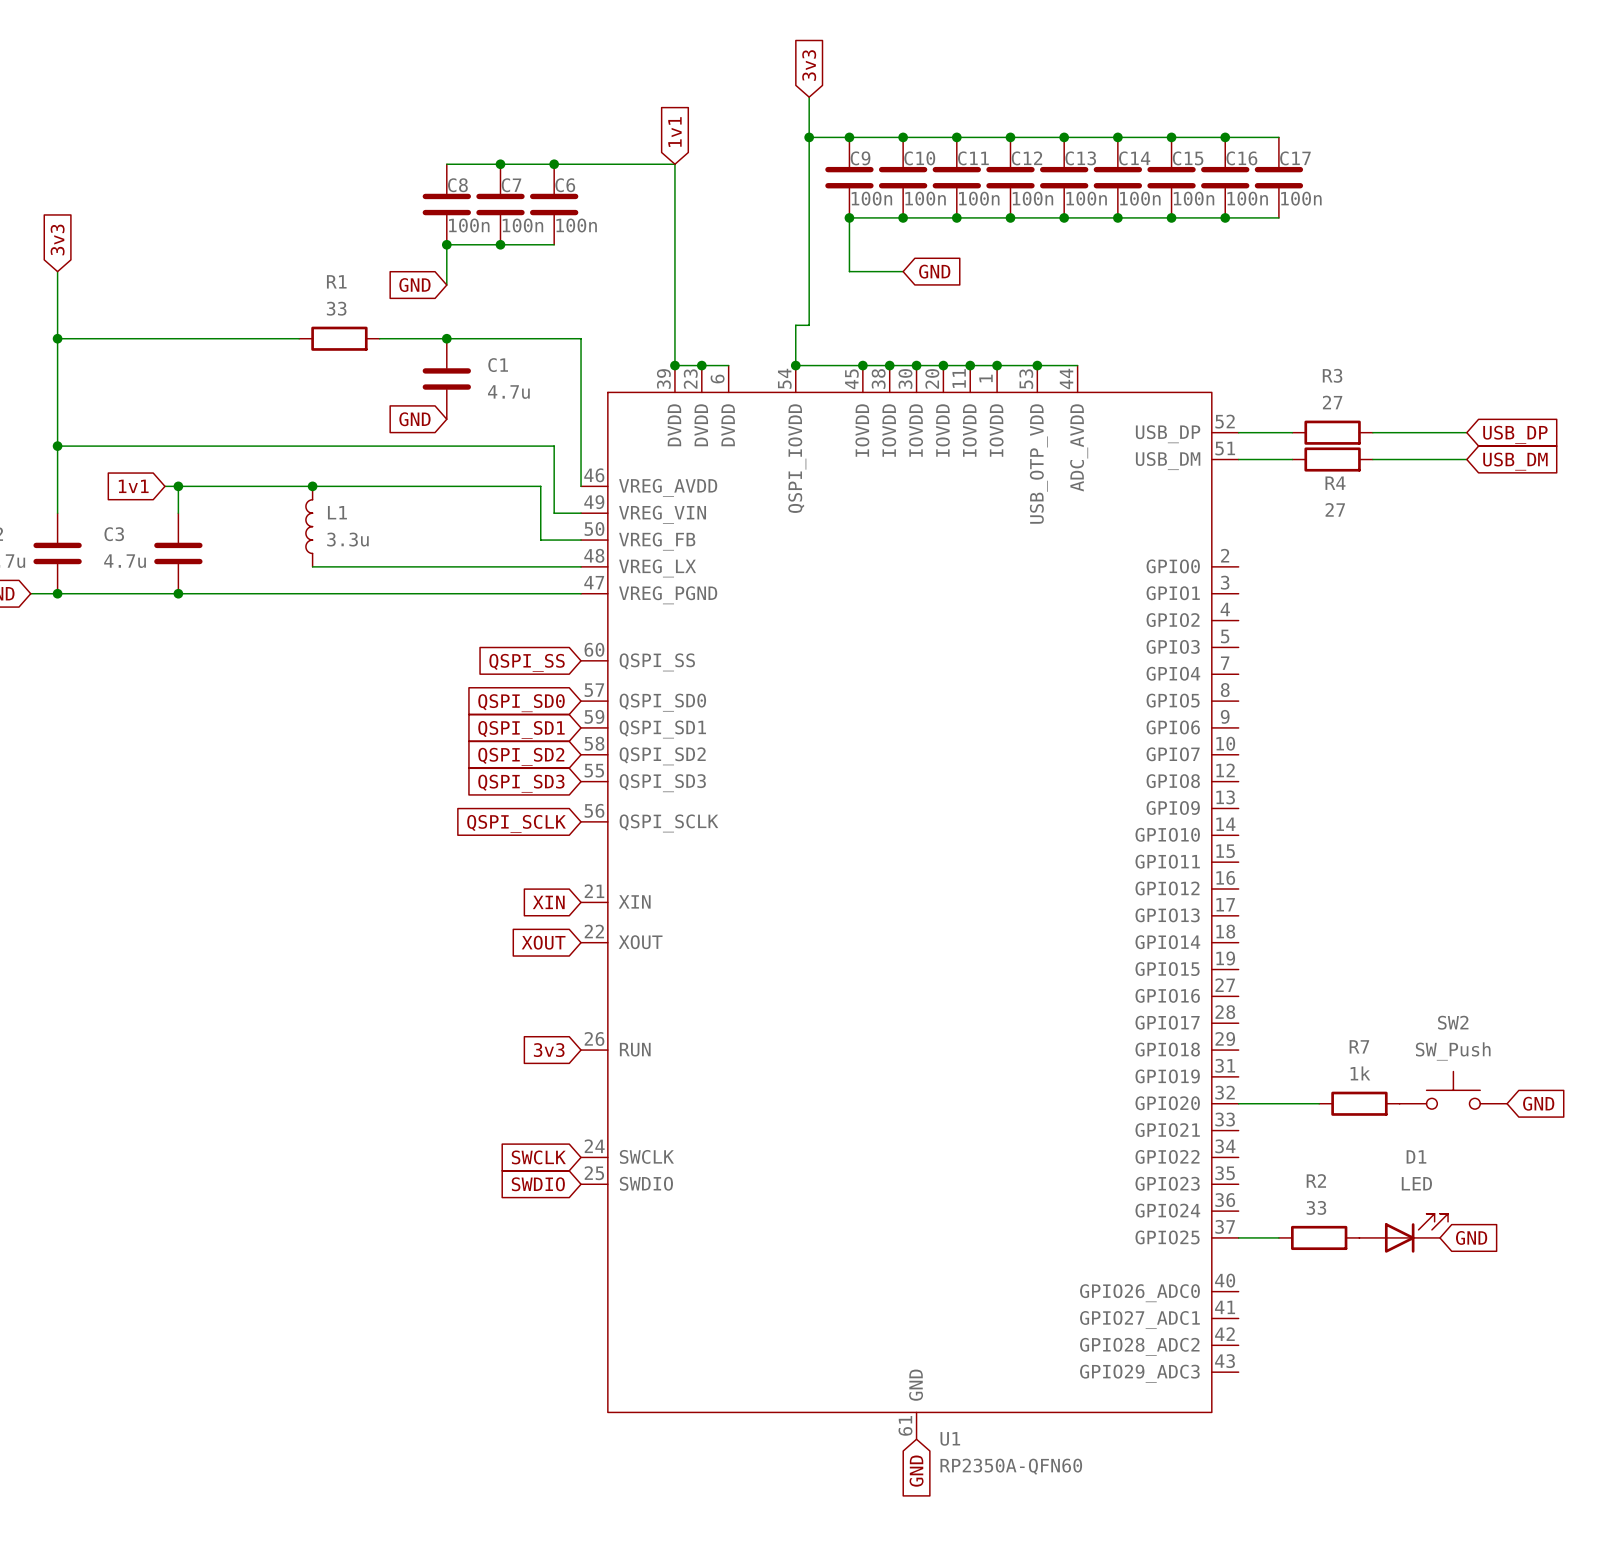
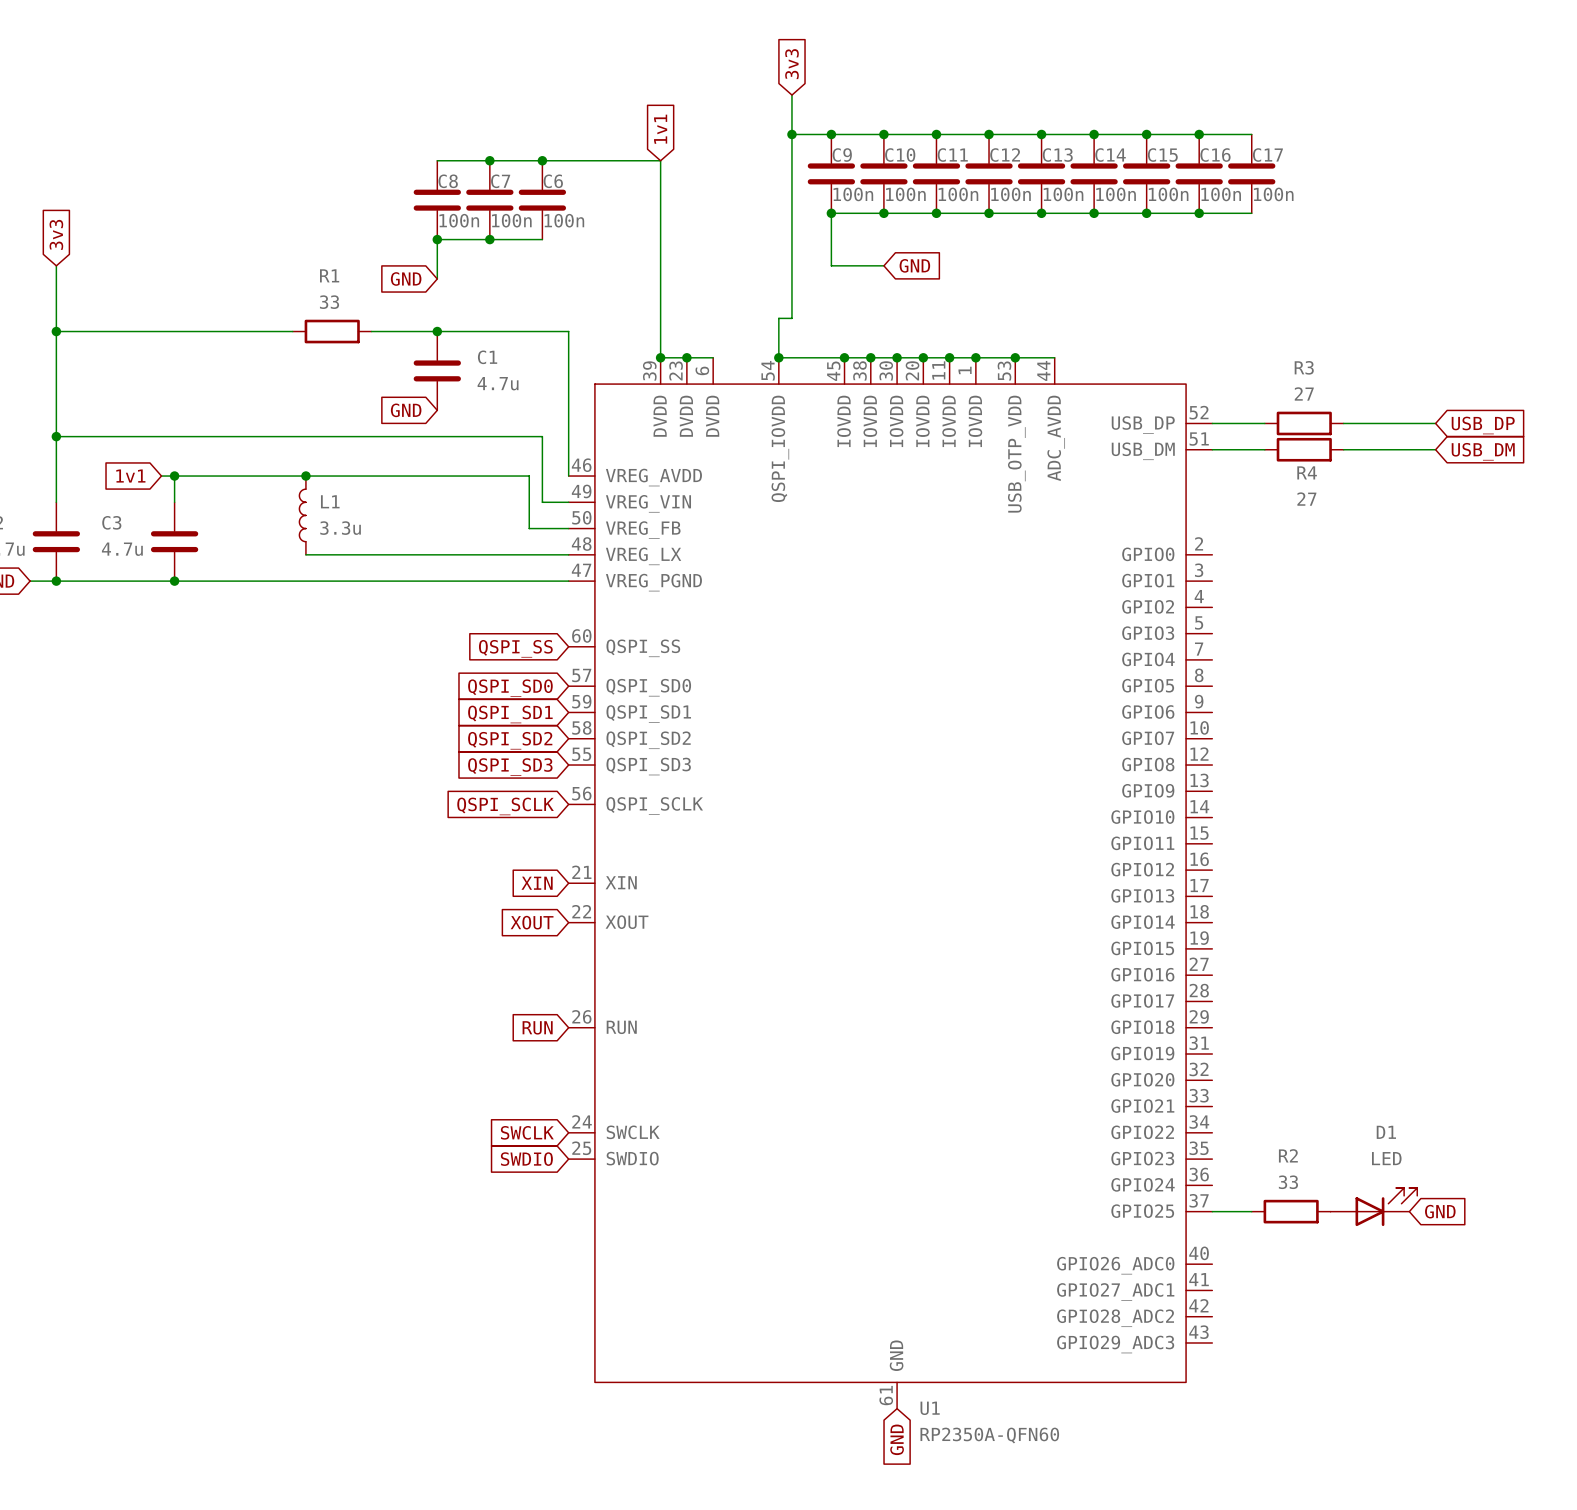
global label: 3v3 (549, 1050) -> RUN (537, 1027)
SW2: SW_Push (1453, 1090) -> none
wire: (1238, 1103) (1319, 1103) -> none
R7: 1k (1359, 1103) -> none
global label: GND (1538, 1103) -> none

